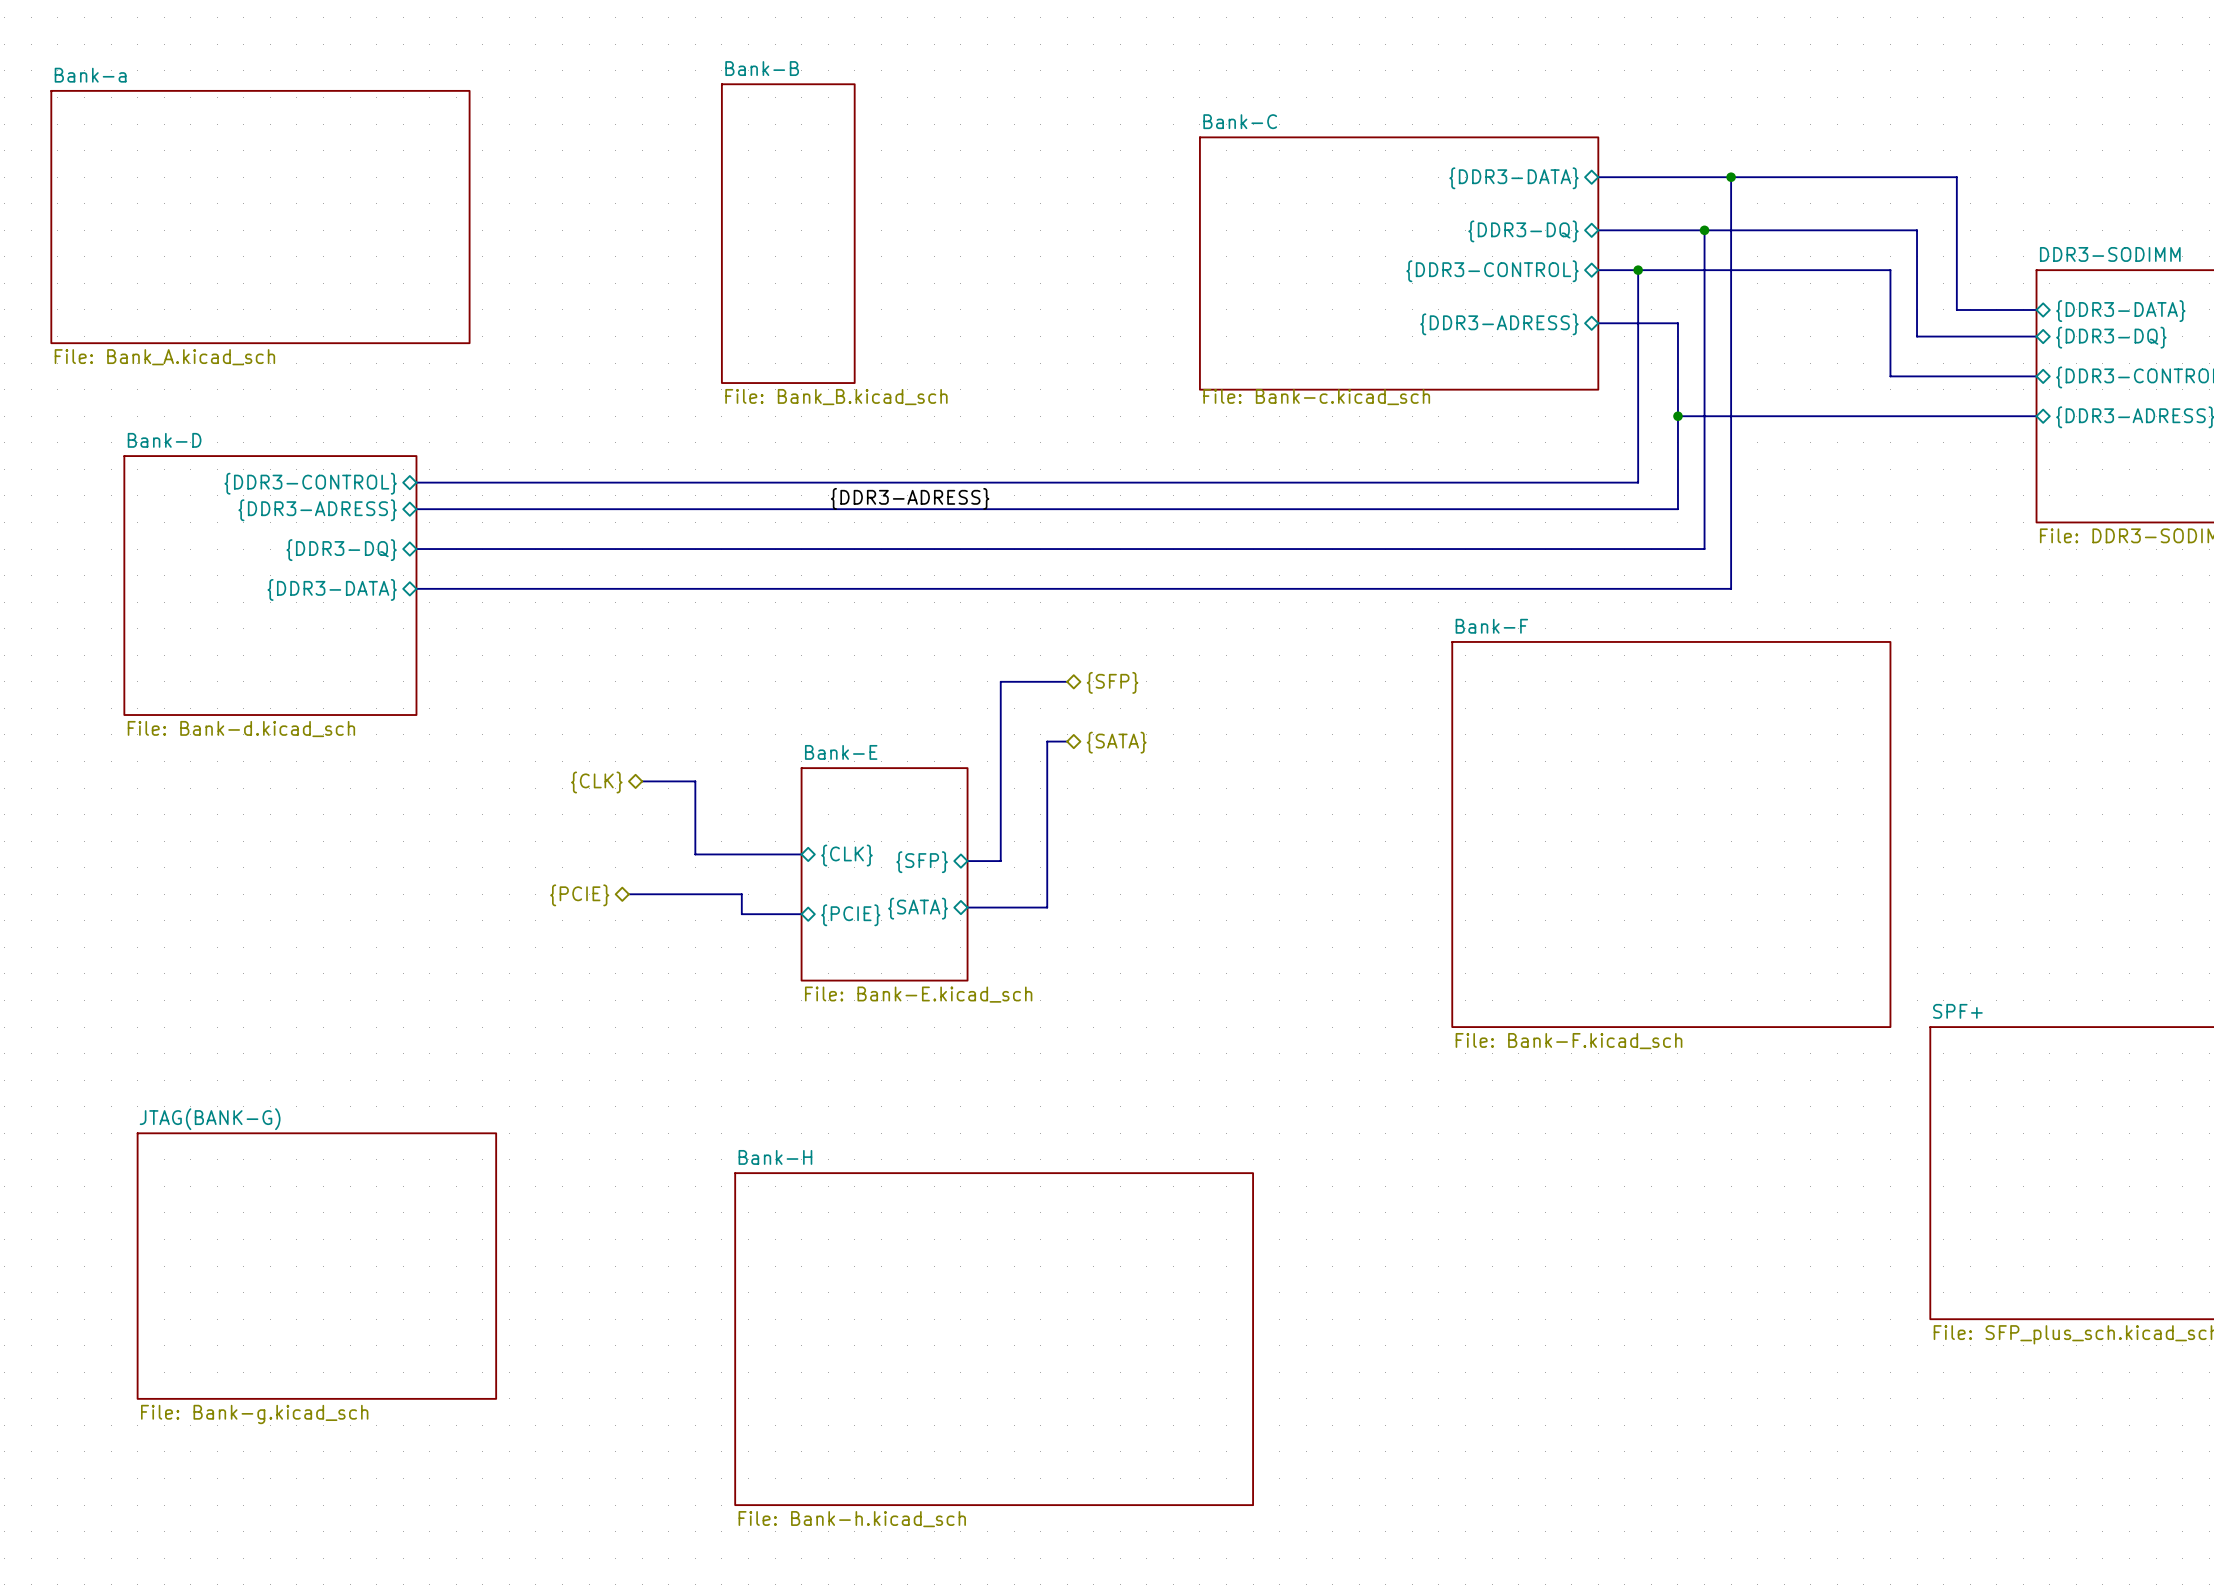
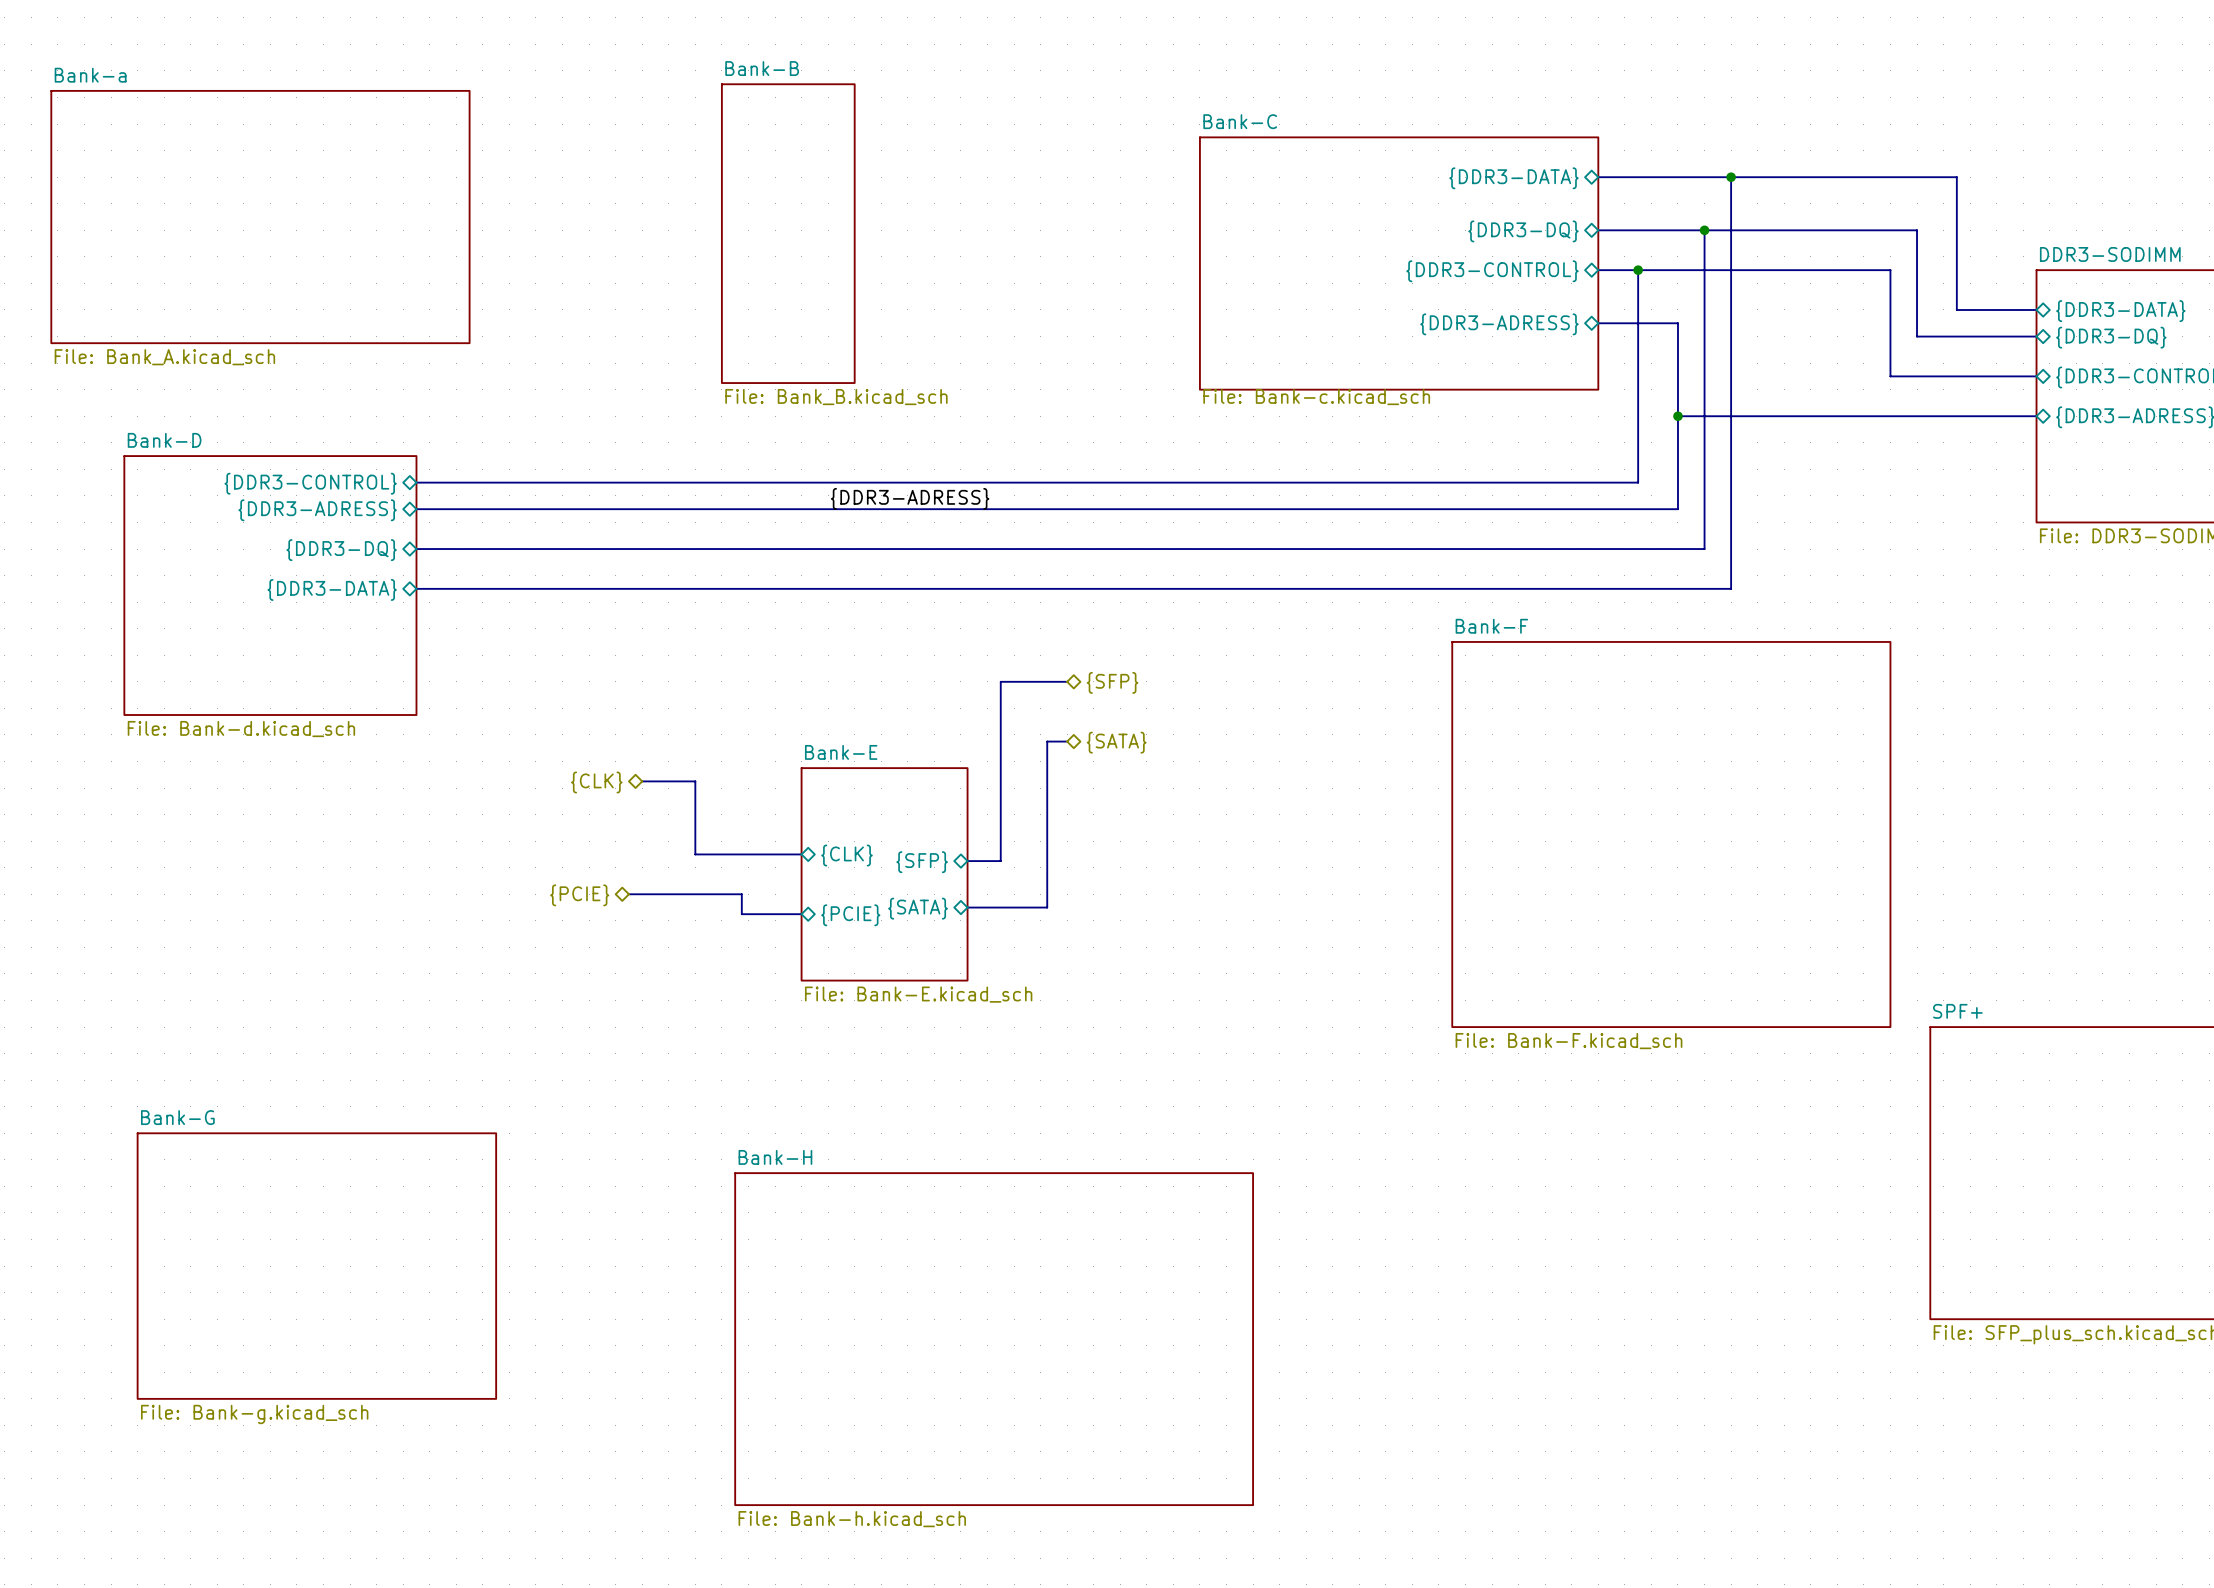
sheet JTAG(BANK-G) name: JTAG(BANK-G) (210, 1119) -> Bank-G (177, 1117)

